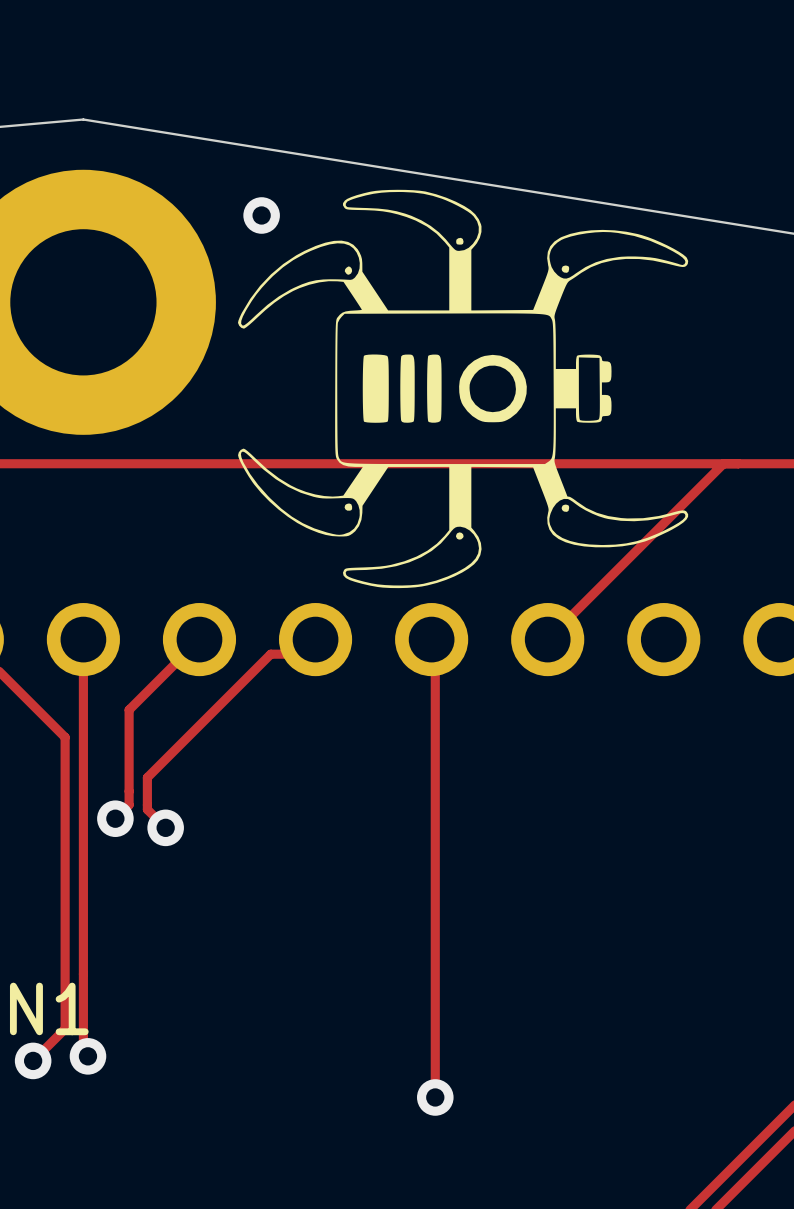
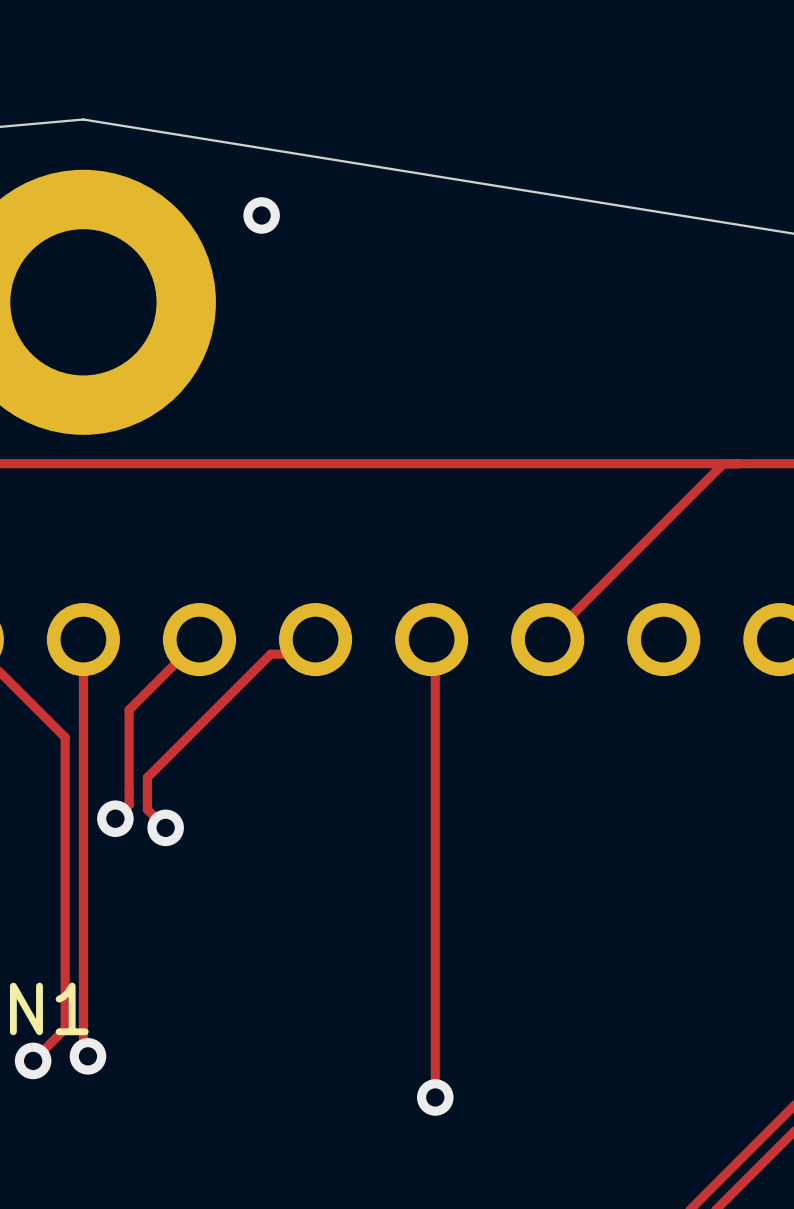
drawing: [238, 189, 689, 589] -> none

